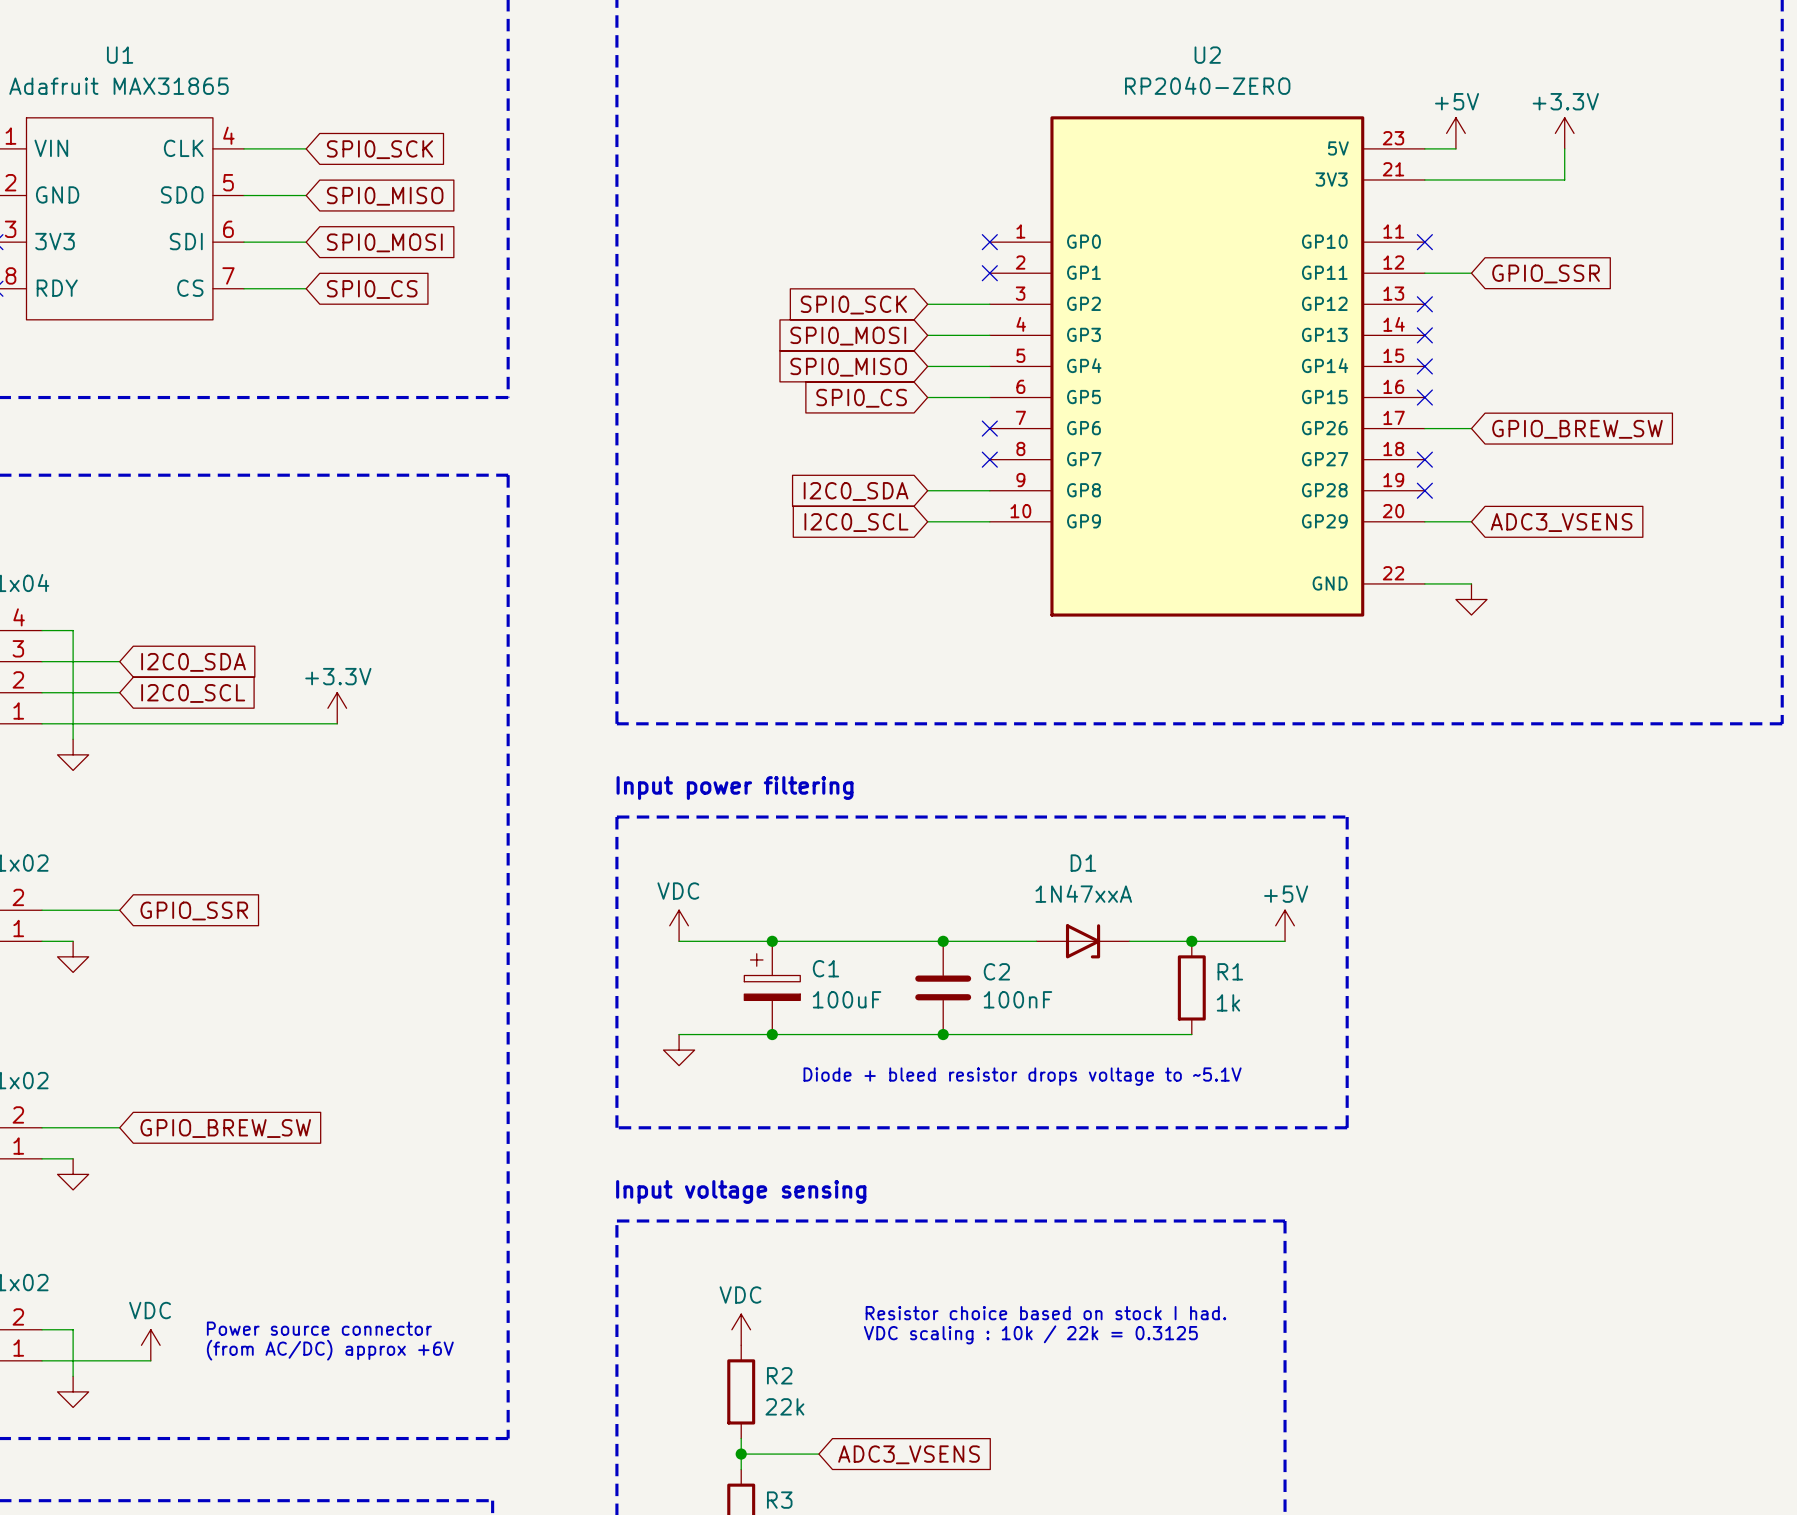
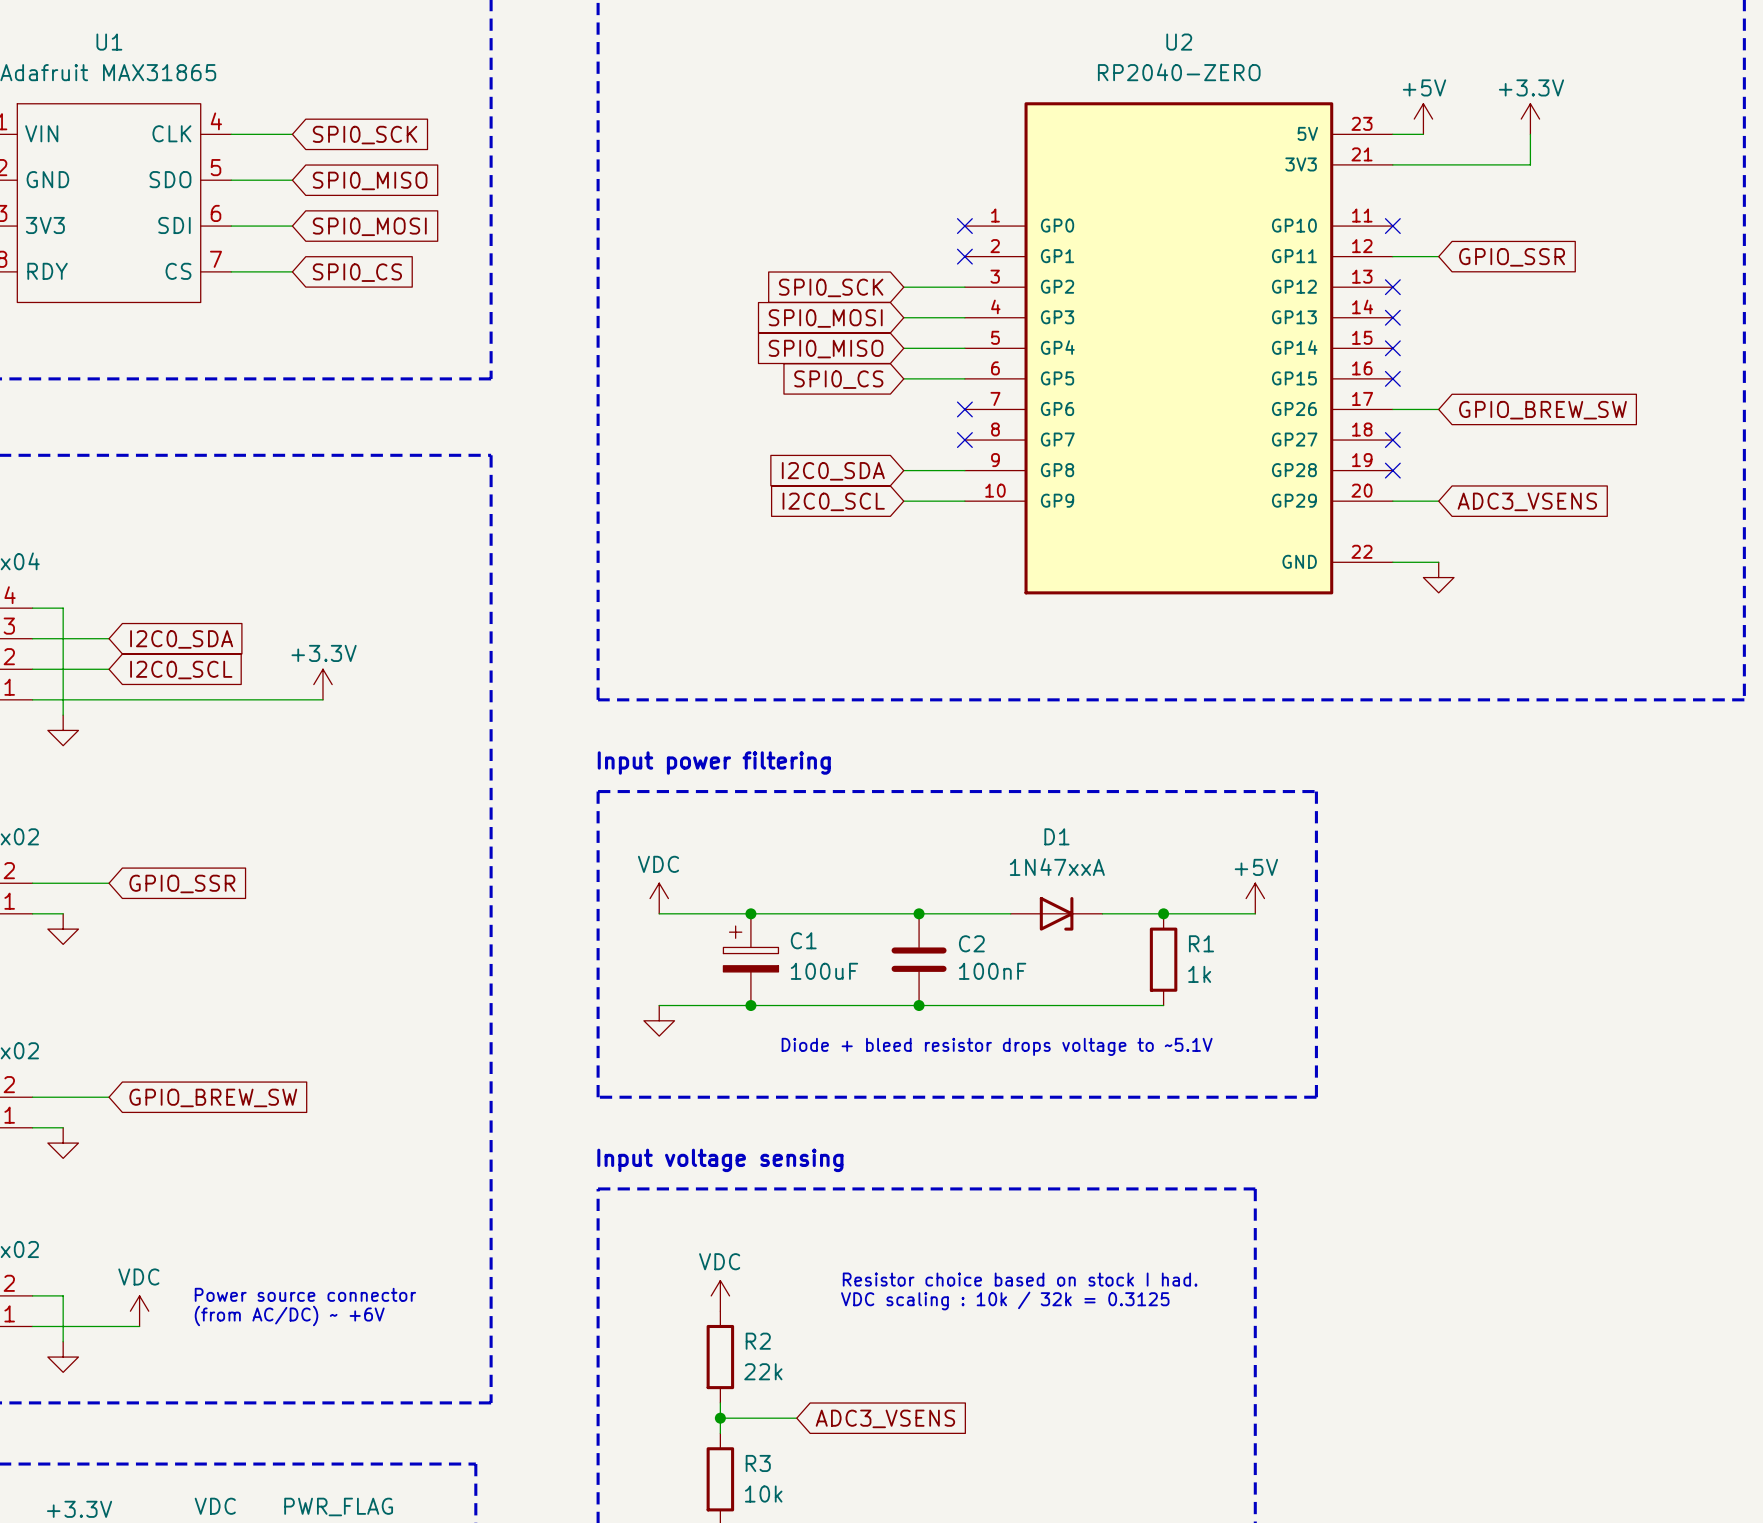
text: VDC scaling : 10k / 22k = 0.3125 (1030, 1334) -> VDC scaling : 10k / 32k = 0.3125 (1005, 1300)
text: (from AC/DC) approx +6V (330, 1350) -> (from AC/DC) ~ +6V (289, 1315)

